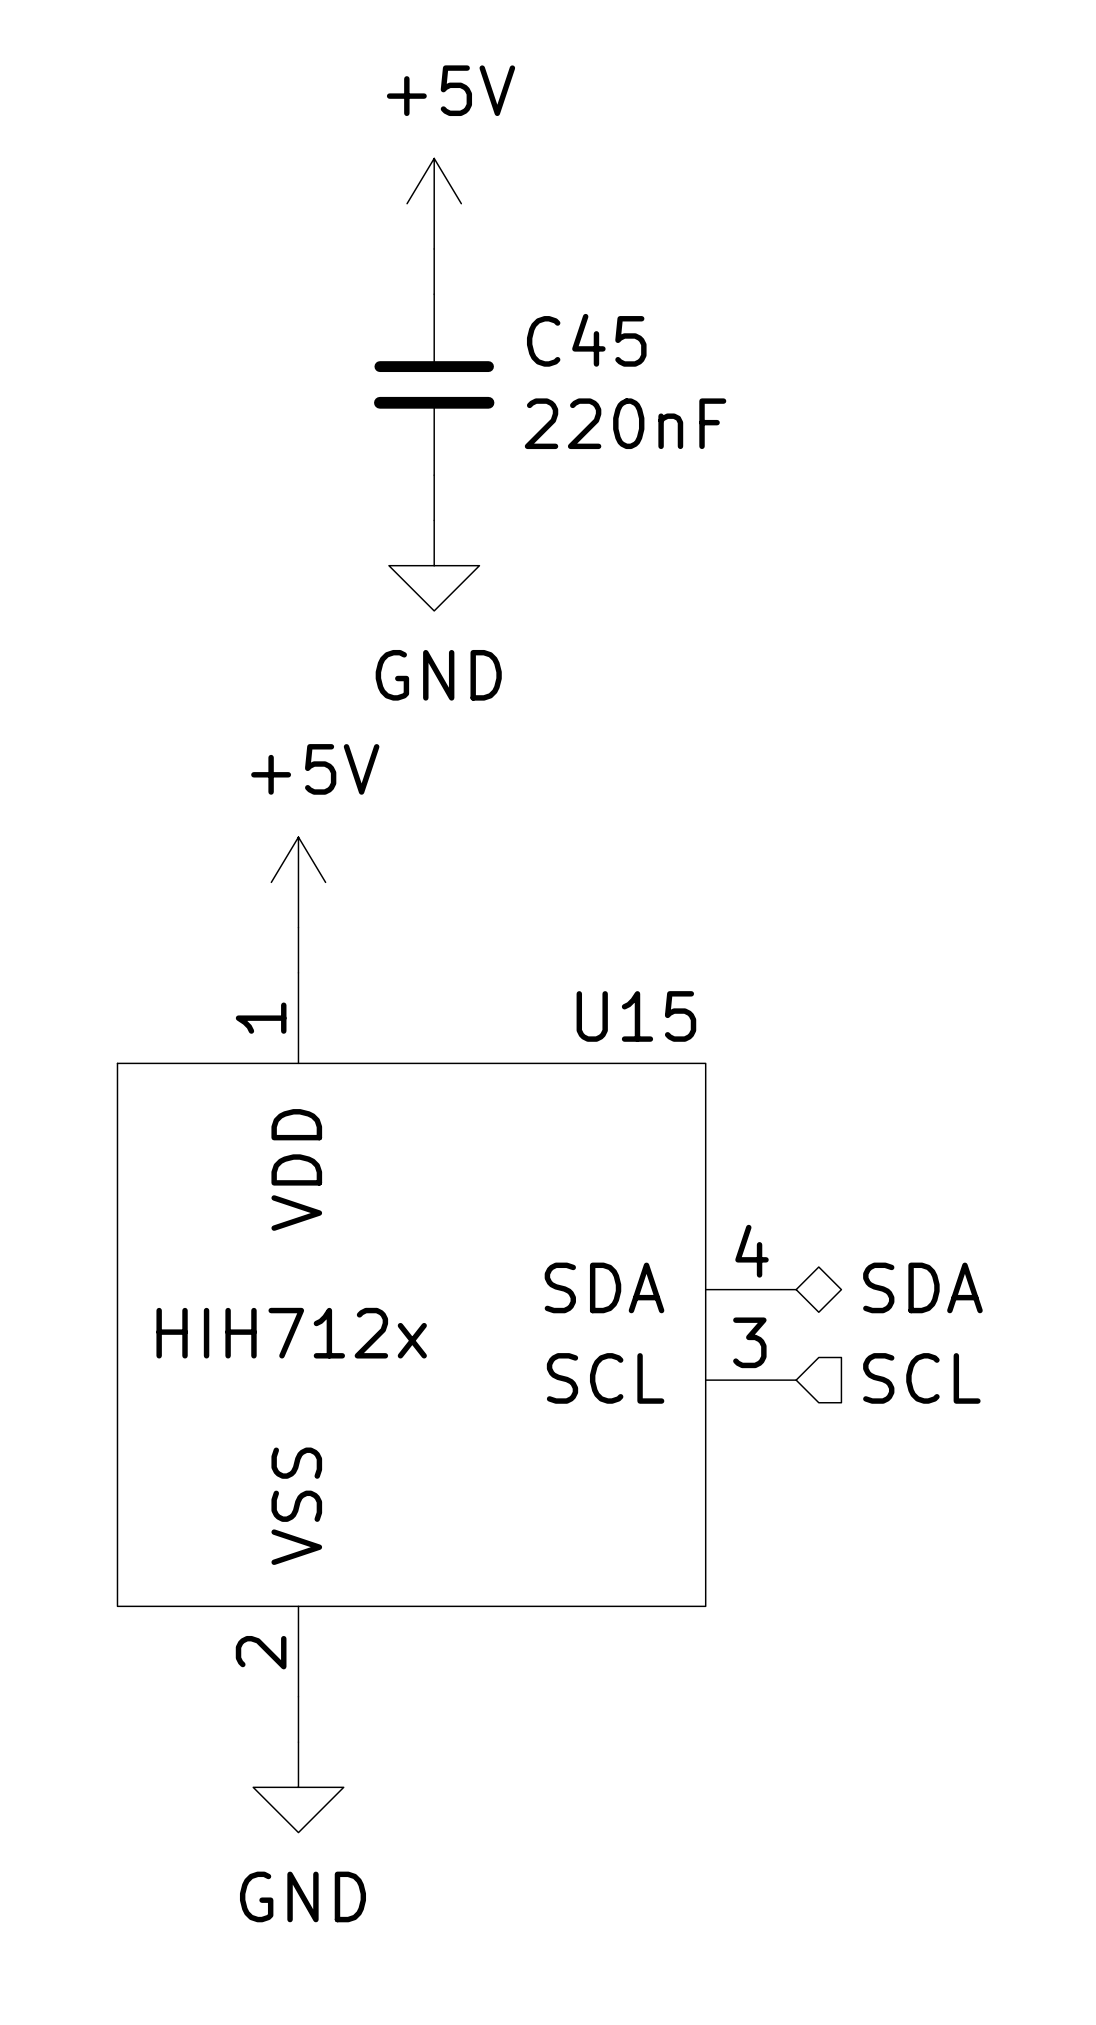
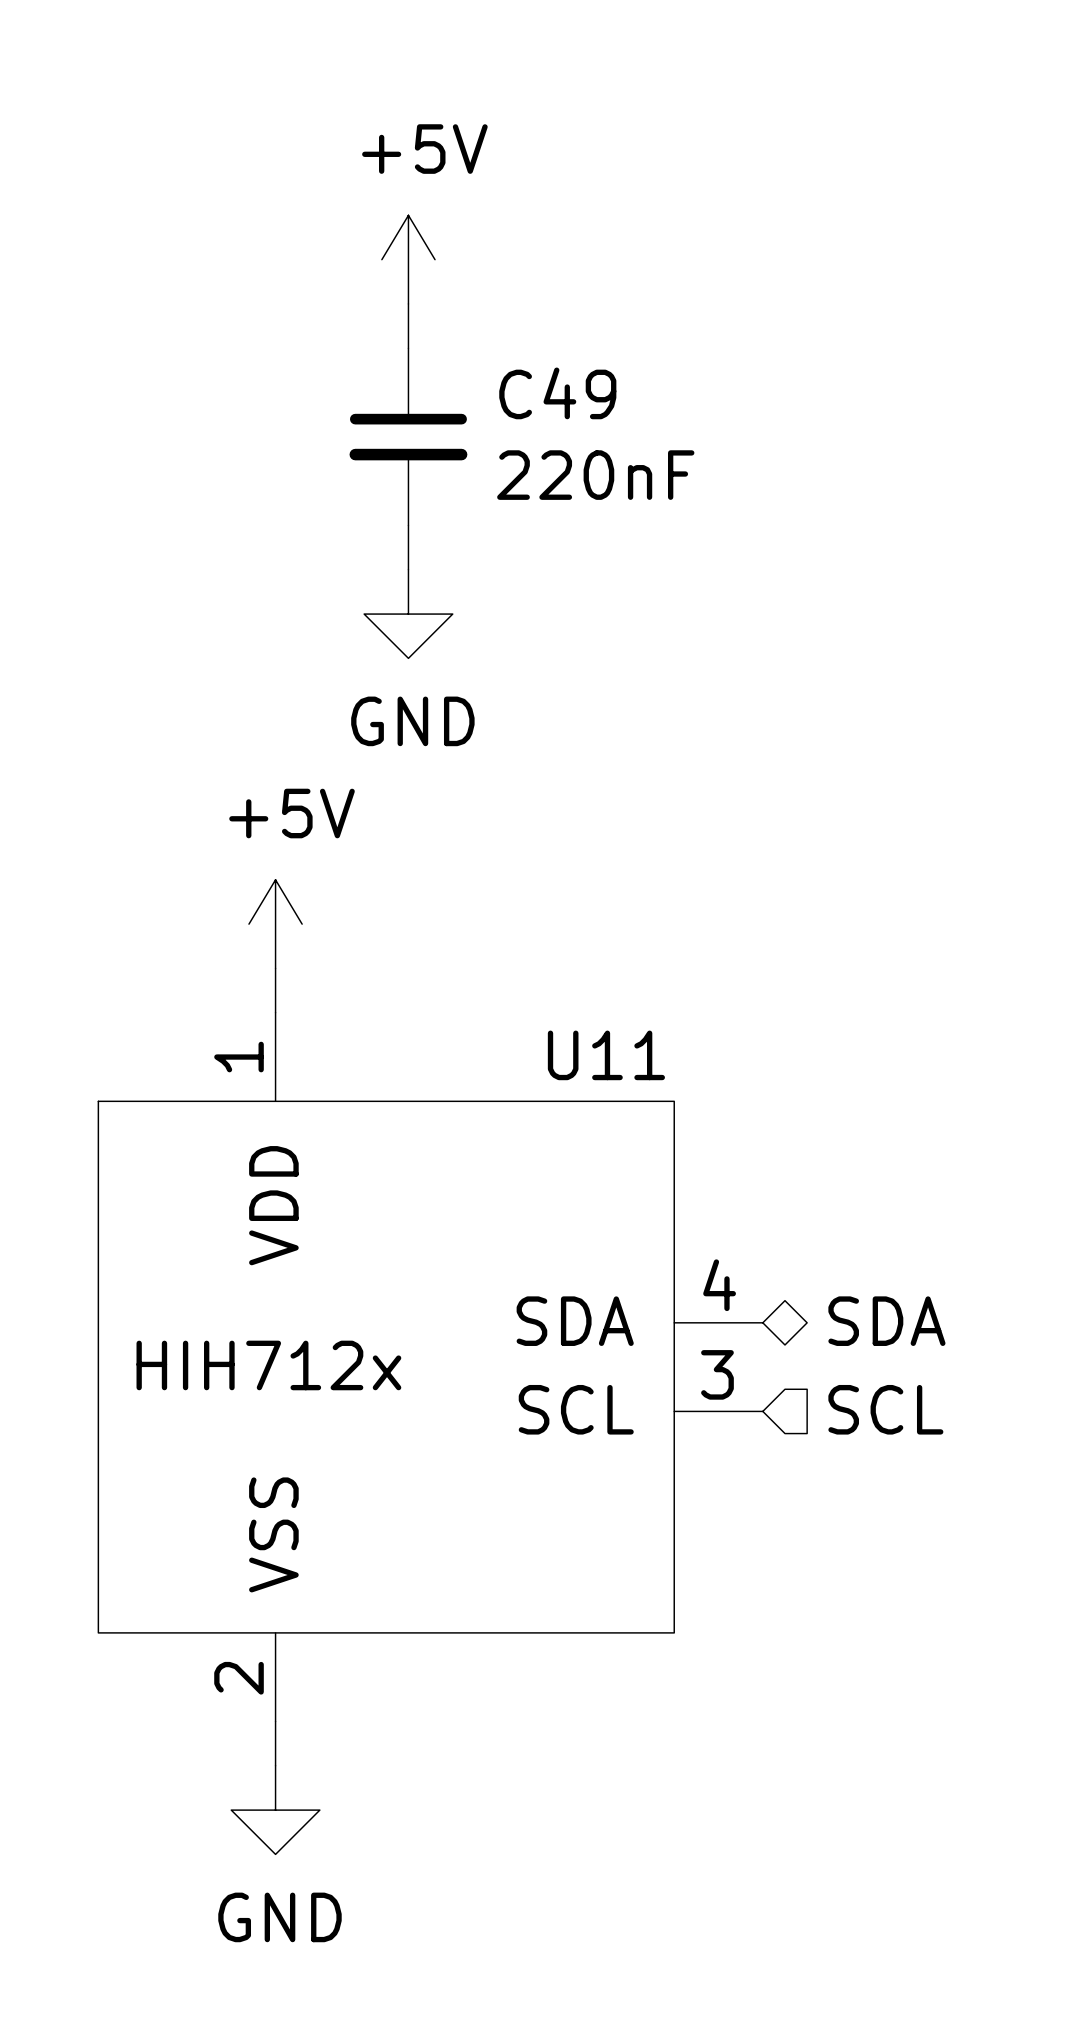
C45 name: C45 (586, 340) -> C49 (557, 393)
U15 name: U15 (636, 1016) -> U11 (606, 1055)

